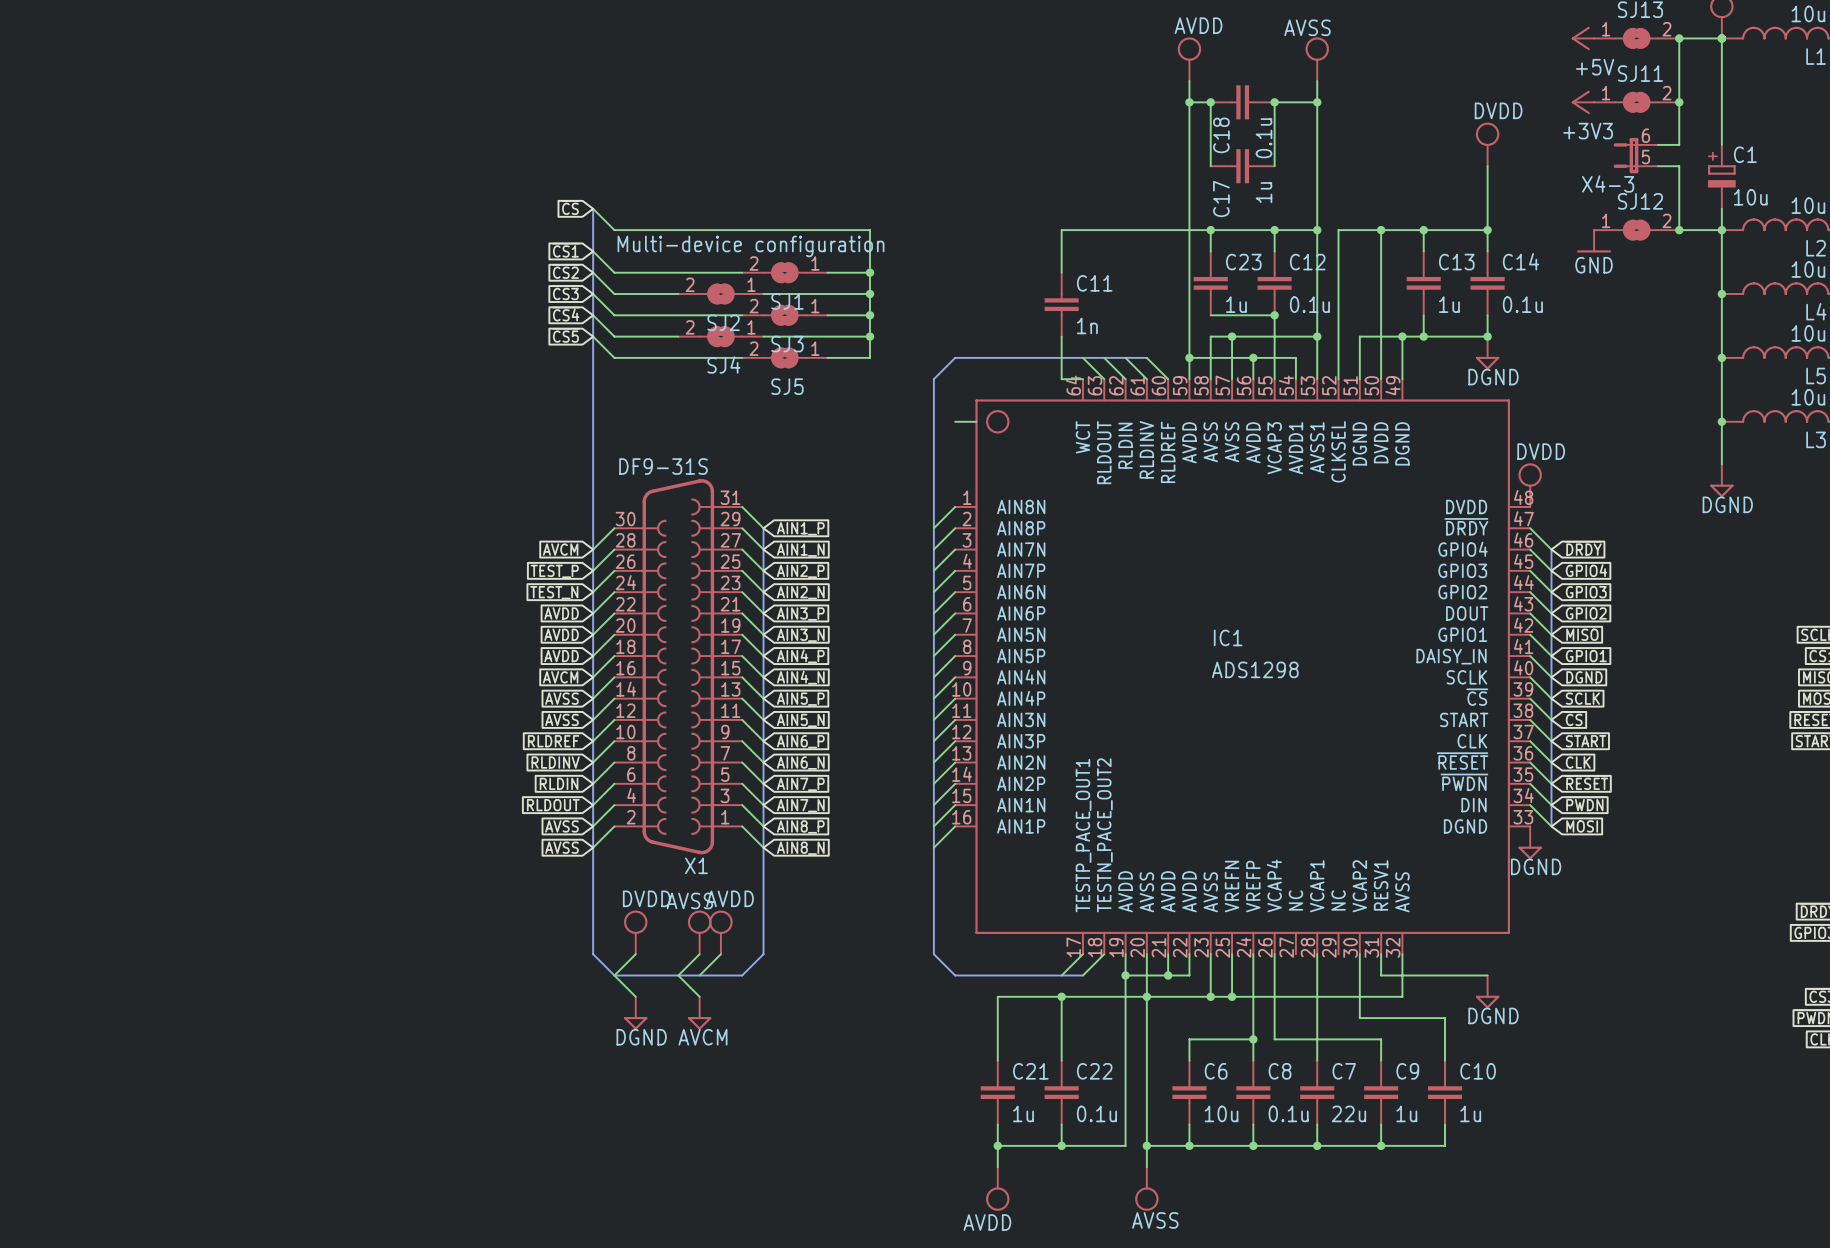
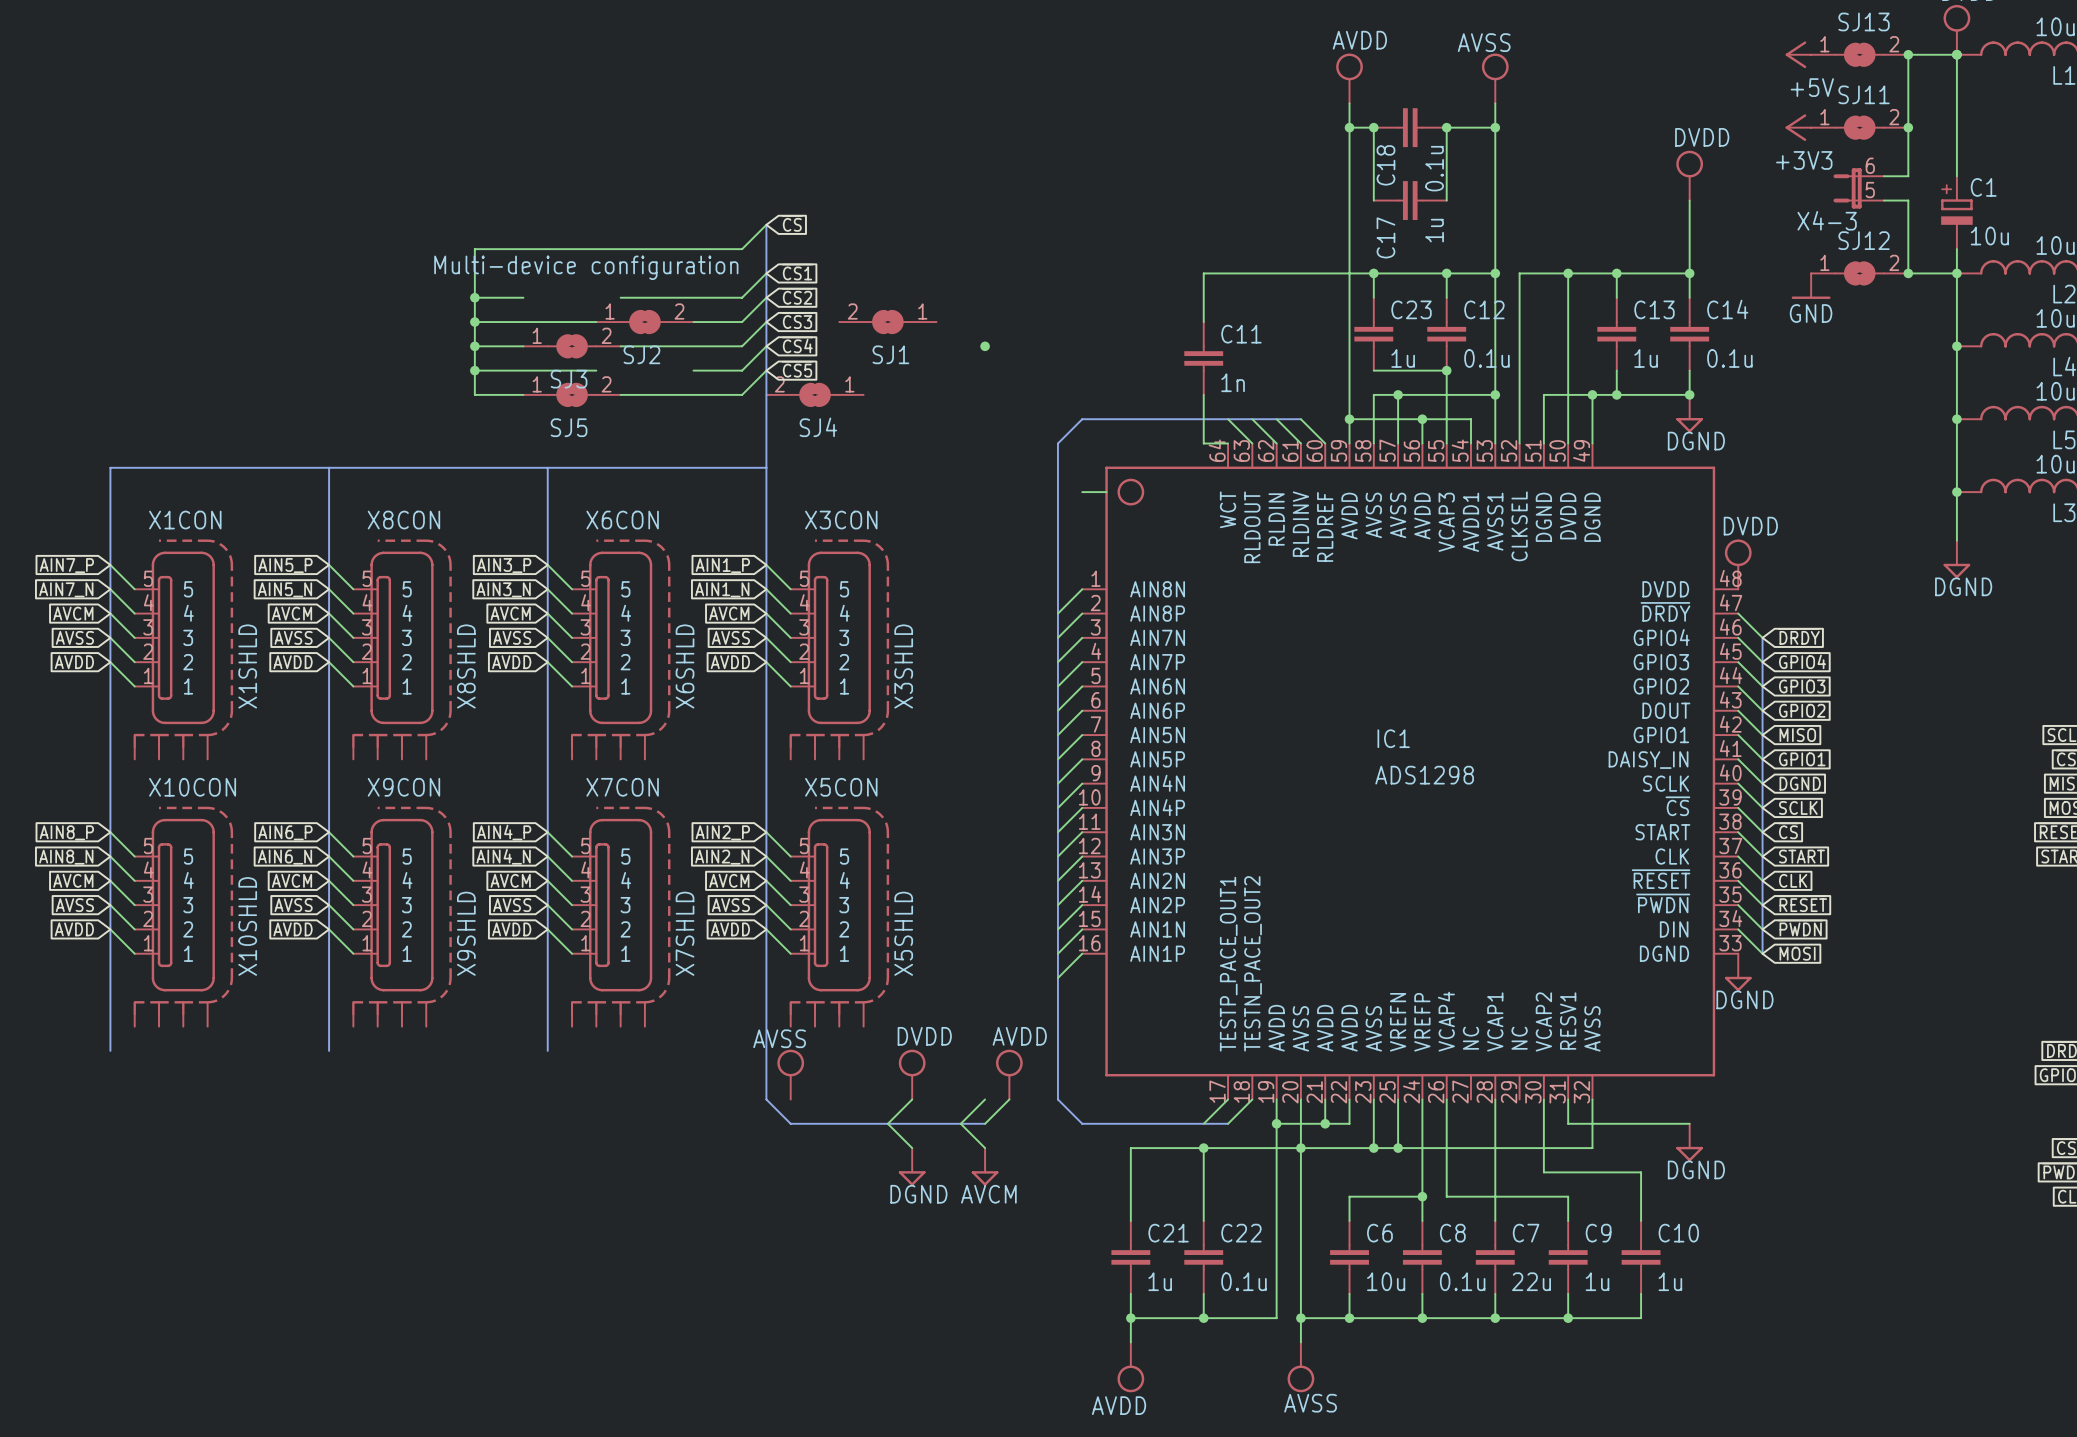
wire: none -> (766, 224) (742, 249) (474, 249) (474, 394) (523, 394)
global label rotation: 0° (570, 207) -> 180° (792, 223)
global label position: ~{CS} (570, 207) -> ~{CS} (792, 223)
bus: (593, 208) (593, 954) (614, 975) (699, 975) -> (766, 224) (766, 1099) (790, 1123)
wire: (593, 208) (614, 230) (870, 230) (870, 357) (827, 357) -> none
wire: none -> (766, 273) (742, 297) (620, 297)
text position: Multi-device configuration (750, 246) -> Multi-device configuration (586, 267)
global label rotation: 0° (565, 250) -> 180° (797, 272)
global label position: ~{CS1} (565, 250) -> ~{CS1} (797, 272)
wire: none -> (474, 297) (523, 297)
junction: none -> (474, 297)
wire: (593, 251) (614, 272) -> none
global label rotation: 0° (565, 271) -> 180° (797, 296)
global label position: ~{CS2} (565, 271) -> ~{CS2} (797, 296)
wire: none -> (474, 322) (596, 322)
junction: none -> (474, 322)
wire: (593, 272) (614, 294) -> (620, 346) (693, 346)
wire: (657, 272) (742, 272) -> (742, 322) (766, 297)
wire: (827, 272) (870, 272) -> none
junction: (870, 272) -> none
global label rotation: 0° (565, 292) -> 180° (797, 320)
global label position: ~{CS3} (565, 292) -> ~{CS3} (797, 320)
wire: none -> (474, 346) (523, 346)
junction: none -> (474, 346)
wire: (593, 294) (614, 315) -> none
wire: (657, 294) (678, 294) -> (742, 346) (766, 322)
SJ2 rotation: 0° (720, 294) -> 180° (644, 322)
SJ2 position: (720, 294) -> (644, 322)
wire: (763, 294) (870, 294) -> none
global label rotation: 0° (565, 314) -> 180° (797, 344)
global label position: ~{CS4} (565, 314) -> ~{CS4} (797, 344)
wire: none -> (474, 370) (596, 370)
junction: none -> (474, 370)
wire: (593, 315) (614, 336) -> (620, 394) (693, 394)
wire: (657, 315) (742, 315) -> (742, 370) (766, 346)
SJ3 rotation: 0° (784, 315) -> 180° (572, 346)
SJ3 position: (784, 315) -> (572, 346)
wire: (827, 315) (870, 315) -> none
junction: (870, 315) -> none
global label rotation: 0° (565, 335) -> 180° (797, 369)
global label position: ~{CS5} (565, 335) -> ~{CS5} (797, 369)
wire: (593, 336) (614, 357) (742, 357) -> none
wire: (657, 336) (678, 336) -> (742, 394) (766, 370)
wire: (763, 336) (870, 336) -> none
junction: (870, 336) -> none
SJ5 rotation: 0° (784, 357) -> 180° (572, 394)
SJ5 position: (784, 357) -> (572, 394)
bus: none -> (329, 467) (329, 1050)
bus: none -> (547, 467) (547, 1050)
bus: none -> (766, 467) (110, 467) (110, 1050)
wire: none -> (110, 564) (134, 589)
wire: none -> (329, 564) (353, 589)
wire: none -> (547, 564) (572, 589)
global label: none -> AIN7_P (66, 565)
global label: none -> AIN5_P (285, 565)
global label: none -> AIN3_P (504, 565)
wire: none -> (110, 589) (134, 613)
wire: none -> (329, 589) (353, 613)
wire: none -> (547, 589) (572, 613)
wire: (742, 506) (763, 528) -> (766, 564) (790, 589)
global label: none -> AIN7_N (66, 589)
global label: none -> AIN5_N (284, 589)
global label: none -> AIN3_N (503, 589)
global label: none -> AVCM (73, 613)
wire: none -> (110, 613) (134, 637)
global label: none -> AVCM (292, 613)
wire: none -> (329, 613) (353, 637)
global label: none -> AVCM (510, 613)
wire: none -> (547, 613) (572, 637)
wire: (614, 528) (593, 549) -> none
global label: none -> AVCM (729, 613)
wire: (742, 528) (763, 549) -> (766, 589) (790, 613)
bus: (763, 528) (763, 954) (742, 975) -> (985, 1123) (839, 1123)
global label rotation: 0° (800, 528) -> 180° (722, 565)
global label position: AIN1_P (800, 528) -> AIN1_P (722, 565)
global label: none -> AVSS (74, 637)
wire: none -> (110, 637) (134, 662)
X1CON: none -> (174, 637)
global label: none -> AVSS (293, 637)
wire: none -> (329, 637) (353, 662)
X8CON: none -> (393, 637)
global label: none -> AVSS (512, 637)
wire: none -> (547, 637) (572, 662)
X6CON: none -> (612, 637)
global label: AVCM (560, 549) -> none
wire: (614, 549) (593, 570) -> none
global label: none -> AVSS (730, 637)
X3CON: none -> (830, 637)
wire: (742, 549) (763, 570) -> (766, 613) (790, 637)
global label rotation: 0° (800, 550) -> 180° (722, 589)
global label position: AIN1_N (800, 550) -> AIN1_N (722, 589)
X1SHLD: none -> (183, 649)
X8SHLD: none -> (401, 649)
X6SHLD: none -> (620, 649)
X3SHLD: none -> (839, 649)
global label: none -> AVDD (74, 662)
wire: none -> (110, 662) (134, 686)
global label: none -> AVDD (293, 662)
wire: none -> (329, 662) (353, 686)
global label: none -> AVDD (511, 662)
wire: none -> (547, 662) (572, 686)
wire: (614, 570) (593, 592) -> none
global label: none -> AVDD (730, 662)
wire: (742, 570) (763, 592) -> (766, 637) (790, 662)
global label: TEST_P (554, 571) -> none
global label rotation: 0° (800, 571) -> 180° (722, 832)
global label position: AIN2_P (800, 571) -> AIN2_P (722, 832)
global label: TEST_N (554, 592) -> none
wire: (614, 592) (593, 613) -> none
wire: (742, 592) (763, 613) -> (766, 662) (790, 686)
global label rotation: 0° (800, 592) -> 180° (722, 857)
global label position: AIN2_N (800, 592) -> AIN2_N (722, 857)
global label: AVDD (561, 613) -> none
wire: (614, 613) (593, 634) -> none
wire: (742, 613) (763, 634) -> none
global label: AIN3_P (800, 613) -> none
global label: AVDD (561, 634) -> none
wire: (614, 634) (593, 656) -> none
wire: (742, 634) (763, 656) -> none
global label: AIN3_N (800, 635) -> none
global label: AVDD (561, 656) -> none
wire: (614, 656) (593, 677) -> none
wire: (742, 656) (763, 677) -> none
global label: AIN4_P (800, 656) -> none
X1: DF9-31S (678, 666) -> none
global label: AVCM (560, 677) -> none
wire: (614, 677) (593, 698) -> none
wire: (742, 677) (763, 698) -> none
global label: AIN4_N (800, 677) -> none
global label: AVSS (562, 698) -> none
wire: (614, 698) (593, 719) -> none
wire: (742, 698) (763, 719) -> none
global label: AIN5_P (800, 699) -> none
wire: none -> (110, 832) (134, 856)
wire: none -> (329, 832) (353, 856)
wire: none -> (547, 832) (572, 856)
global label: AVSS (562, 719) -> none
wire: (614, 719) (593, 741) -> none
wire: (742, 719) (763, 741) -> none
global label: none -> AIN8_P (66, 832)
global label: none -> AIN6_P (285, 832)
global label: none -> AIN4_P (504, 832)
global label: AIN5_N (800, 720) -> none
global label: none -> AIN8_N (66, 857)
wire: none -> (110, 856) (134, 880)
global label: none -> AIN6_N (284, 857)
wire: none -> (329, 856) (353, 880)
global label: none -> AIN4_N (503, 856)
wire: none -> (547, 856) (572, 880)
global label: RLDREF (553, 741) -> none
wire: (614, 741) (593, 762) -> none
wire: (742, 741) (763, 762) -> (766, 832) (790, 856)
global label: AIN6_P (800, 741) -> none
global label: none -> AVCM (73, 880)
wire: none -> (110, 880) (134, 905)
global label: none -> AVCM (292, 880)
wire: none -> (329, 880) (353, 905)
global label: none -> AVCM (510, 880)
wire: none -> (547, 880) (572, 905)
global label: RLDINV (555, 762) -> none
wire: (614, 762) (593, 783) -> none
global label: none -> AVCM (729, 880)
wire: (742, 762) (763, 783) -> (766, 856) (790, 880)
global label: AIN6_N (800, 763) -> none
global label: none -> AVSS (74, 905)
wire: none -> (110, 905) (134, 929)
X10CON: none -> (174, 905)
global label: none -> AVSS (293, 905)
wire: none -> (329, 905) (353, 929)
X9CON: none -> (393, 905)
global label: none -> AVSS (512, 905)
wire: none -> (547, 905) (572, 929)
X7CON: none -> (612, 905)
global label: RLDIN (559, 783) -> none
wire: (614, 783) (593, 805) -> none
global label: none -> AVSS (730, 905)
X5CON: none -> (830, 905)
wire: (742, 783) (763, 805) -> (766, 880) (790, 905)
global label: AIN7_P (800, 784) -> none
X10SHLD: none -> (183, 916)
X9SHLD: none -> (401, 916)
X7SHLD: none -> (620, 916)
X5SHLD: none -> (839, 916)
global label: none -> AVDD (74, 929)
wire: none -> (110, 929) (134, 953)
global label: none -> AVDD (293, 929)
wire: none -> (329, 929) (353, 953)
global label: none -> AVDD (511, 929)
wire: none -> (547, 929) (572, 953)
global label: RLDOUT (553, 805) -> none
wire: (614, 805) (593, 826) -> none
global label: none -> AVDD (730, 929)
wire: (742, 805) (763, 826) -> (766, 905) (790, 929)
global label: AIN7_N (800, 805) -> none
global label: AVSS (562, 826) -> none
wire: (614, 826) (593, 847) -> none
wire: (742, 826) (763, 847) -> (766, 929) (790, 953)
global label: AIN8_P (800, 826) -> none
global label: AVSS (562, 847) -> none
global label: AIN8_N (800, 848) -> none
power symbol position: DVDD (635, 932) -> DVDD (912, 1074)
power symbol position: AVDD (720, 932) -> AVDD (1009, 1074)
wire: (635, 954) (614, 975) (635, 996) -> (912, 1099) (887, 1123) (912, 1148)
wire: (699, 954) (678, 975) (699, 996) -> (985, 1099) (960, 1123) (985, 1148)
wire: (720, 954) (699, 975) -> (1009, 1099) (985, 1123)
power symbol position: DGND (635, 1013) -> DGND (912, 1166)
power symbol position: AVCM (699, 1013) -> AVCM (985, 1166)

